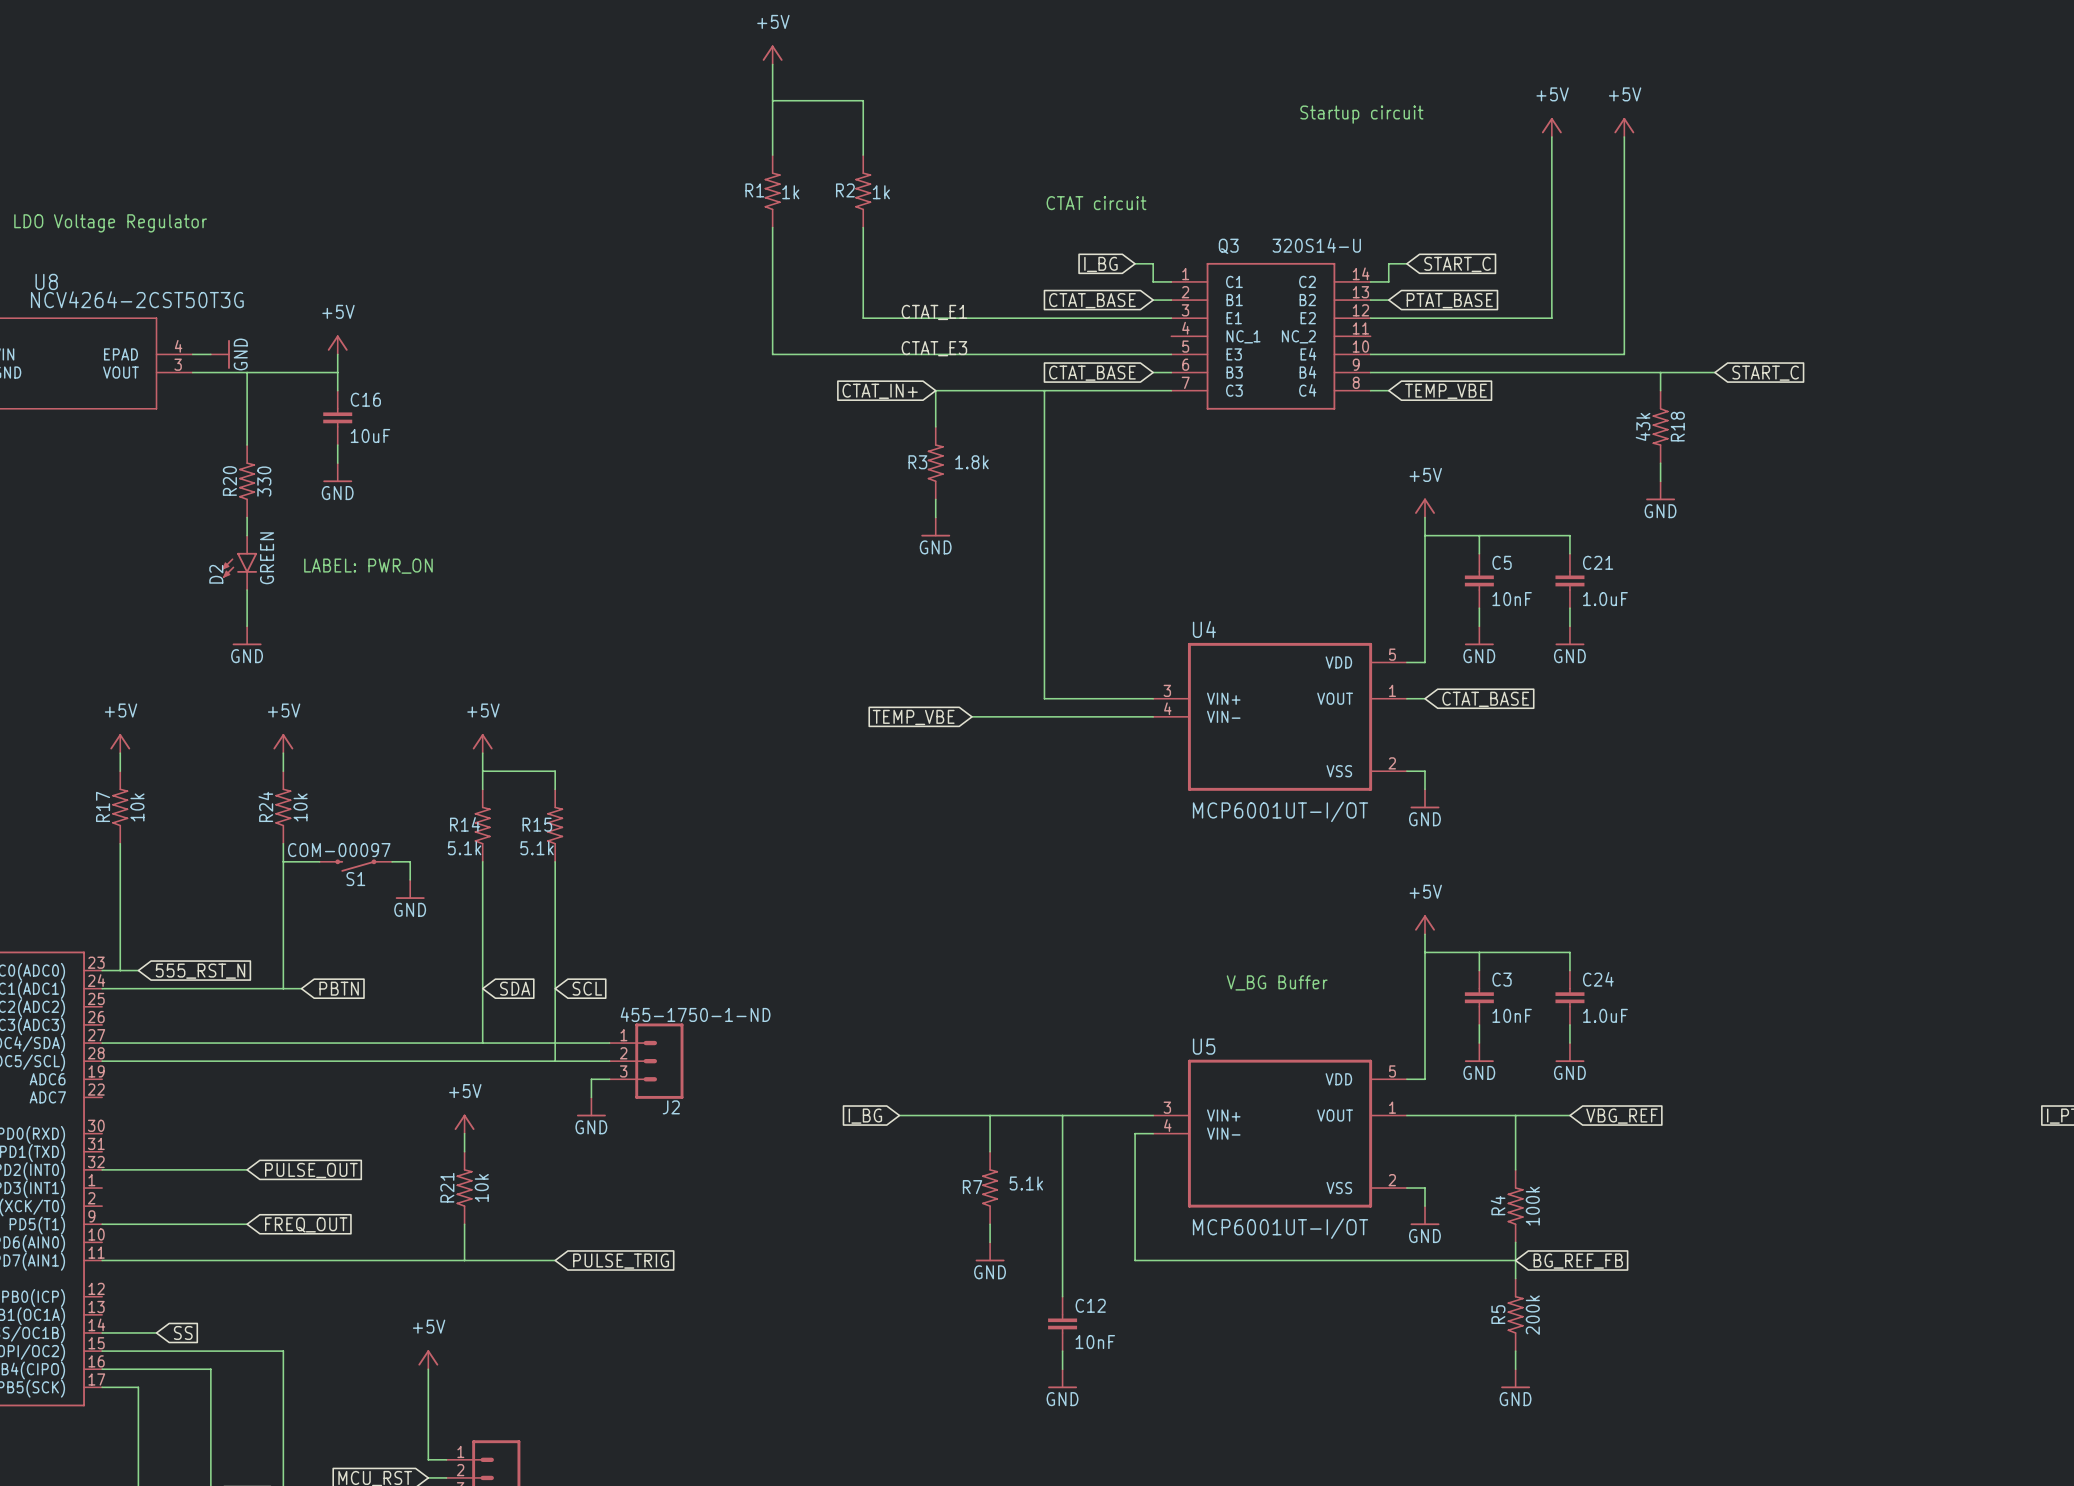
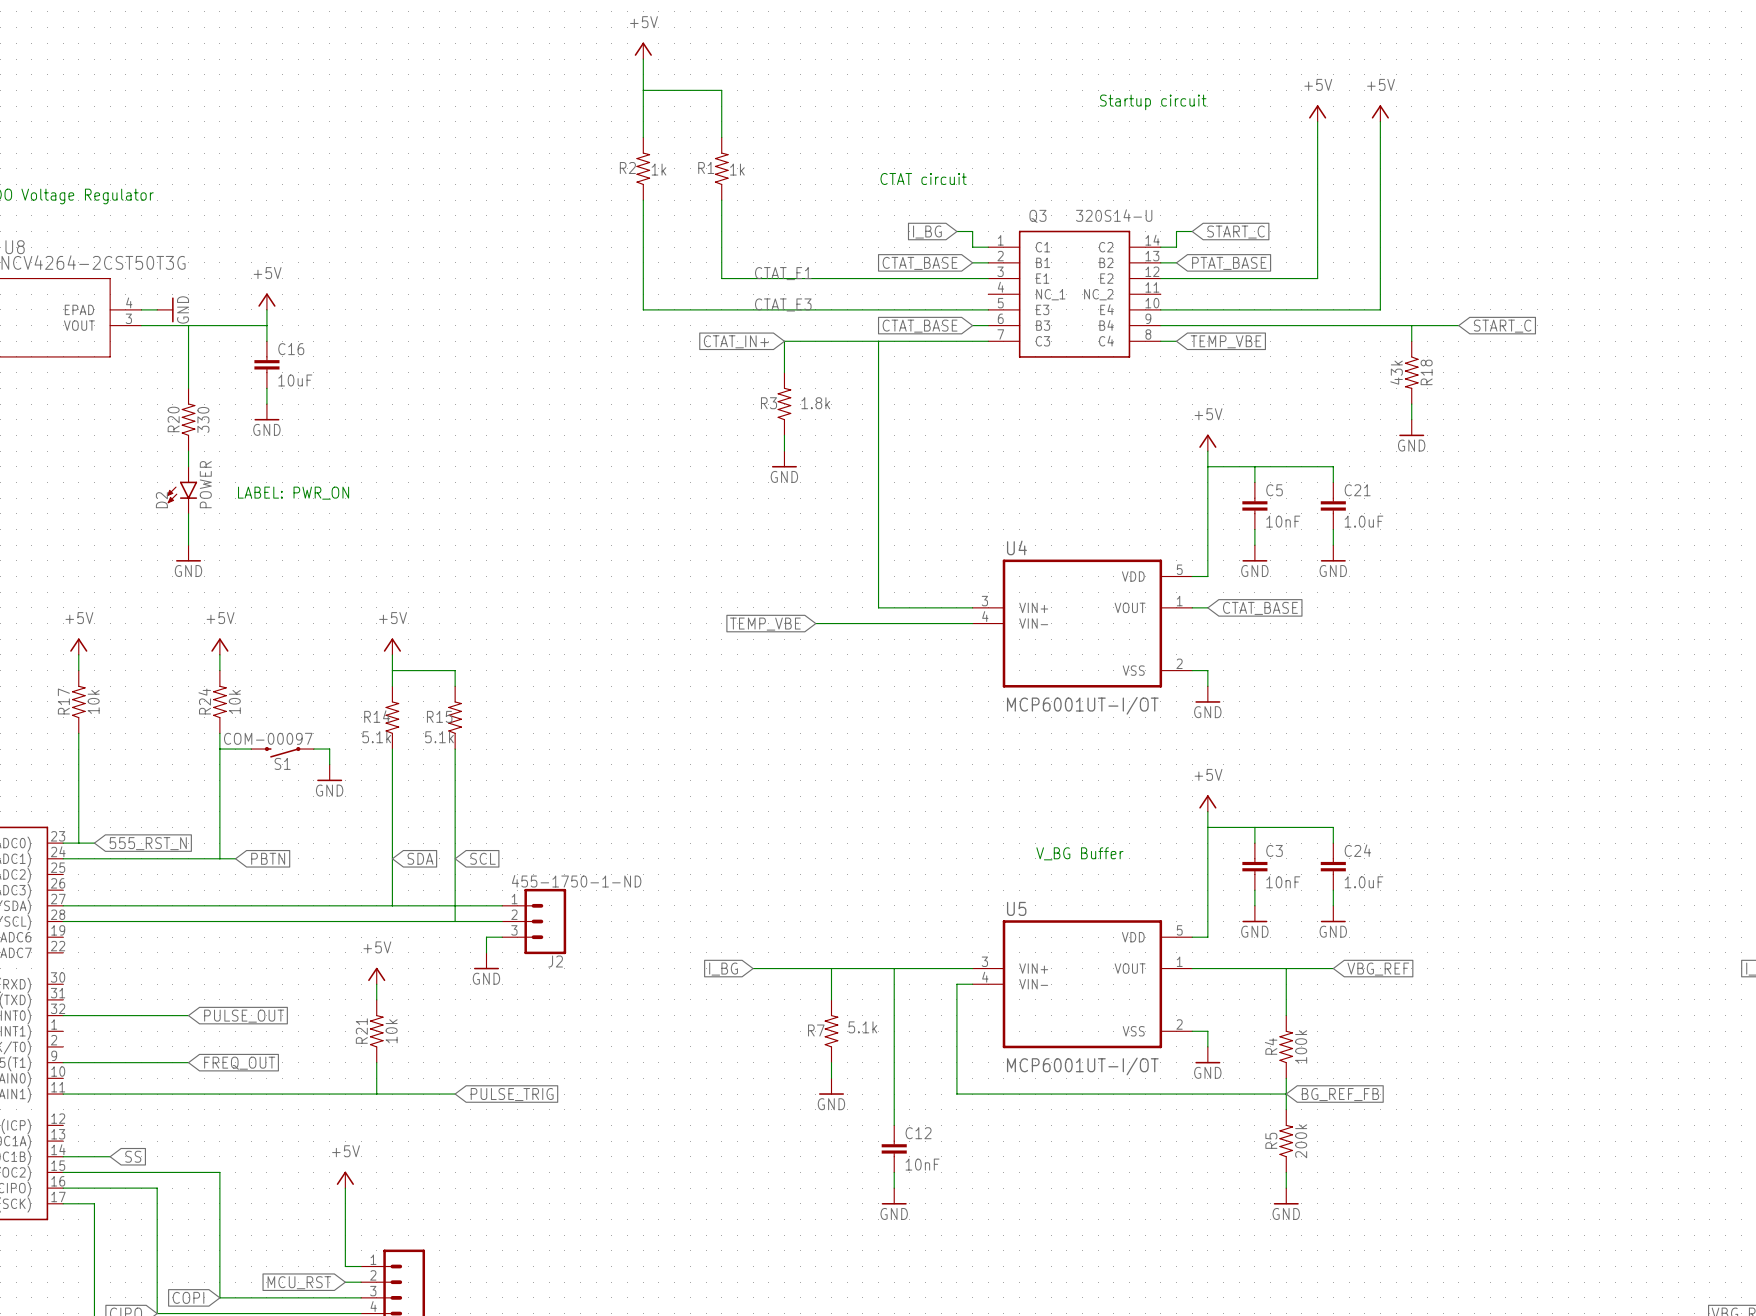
R1 name: R1 (754, 190) -> R2 (627, 168)
R2 name: R2 (845, 190) -> R1 (706, 168)
D2 value: GREEN (267, 558) -> POWER (205, 484)

